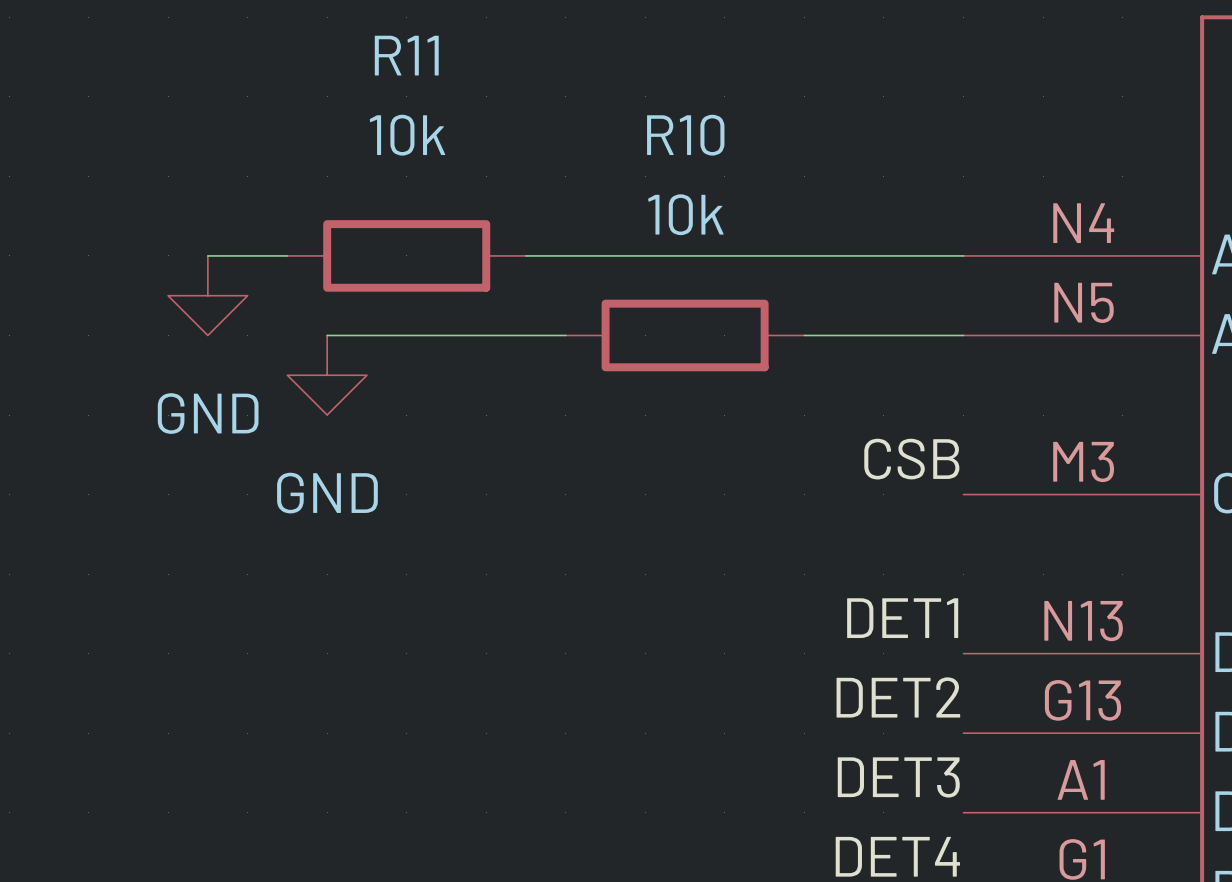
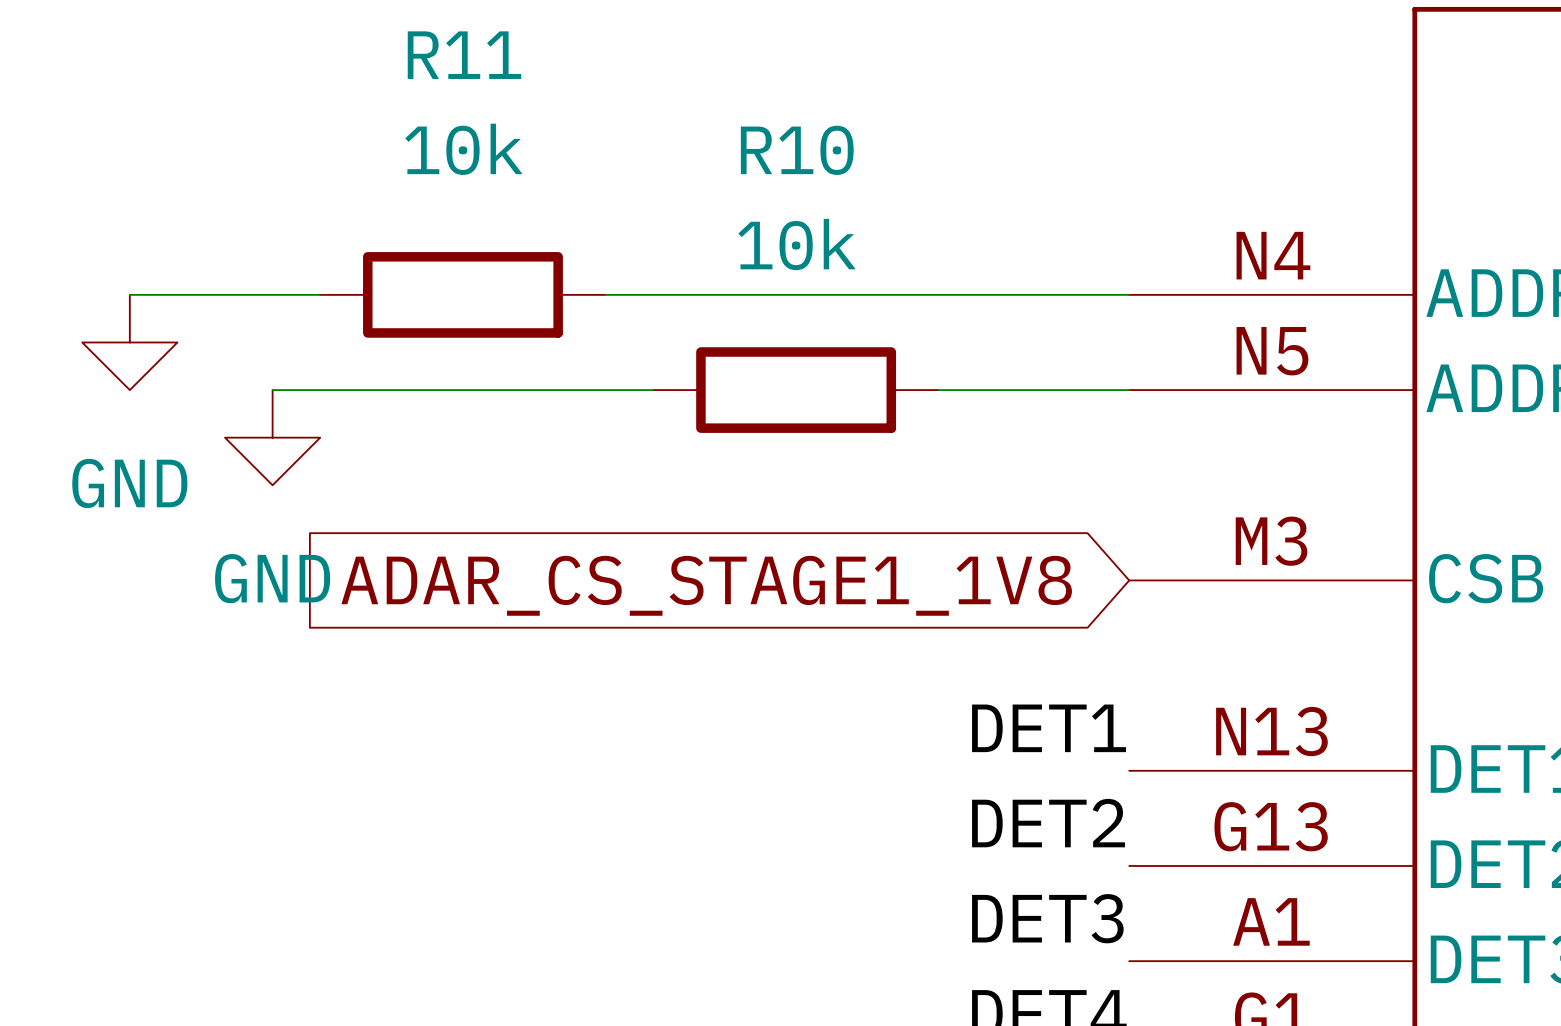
wire: none -> (129, 294) (225, 294)
power symbol: none -> GND (129, 342)
power symbol: GND (207, 295) -> none
wire: none -> (272, 390) (367, 390)
power symbol: none -> GND (272, 437)
power symbol: GND (327, 375) -> none
label: CSB (911, 459) -> none
global label: none -> ADAR_CS_STAGE1_1V8 (706, 585)

